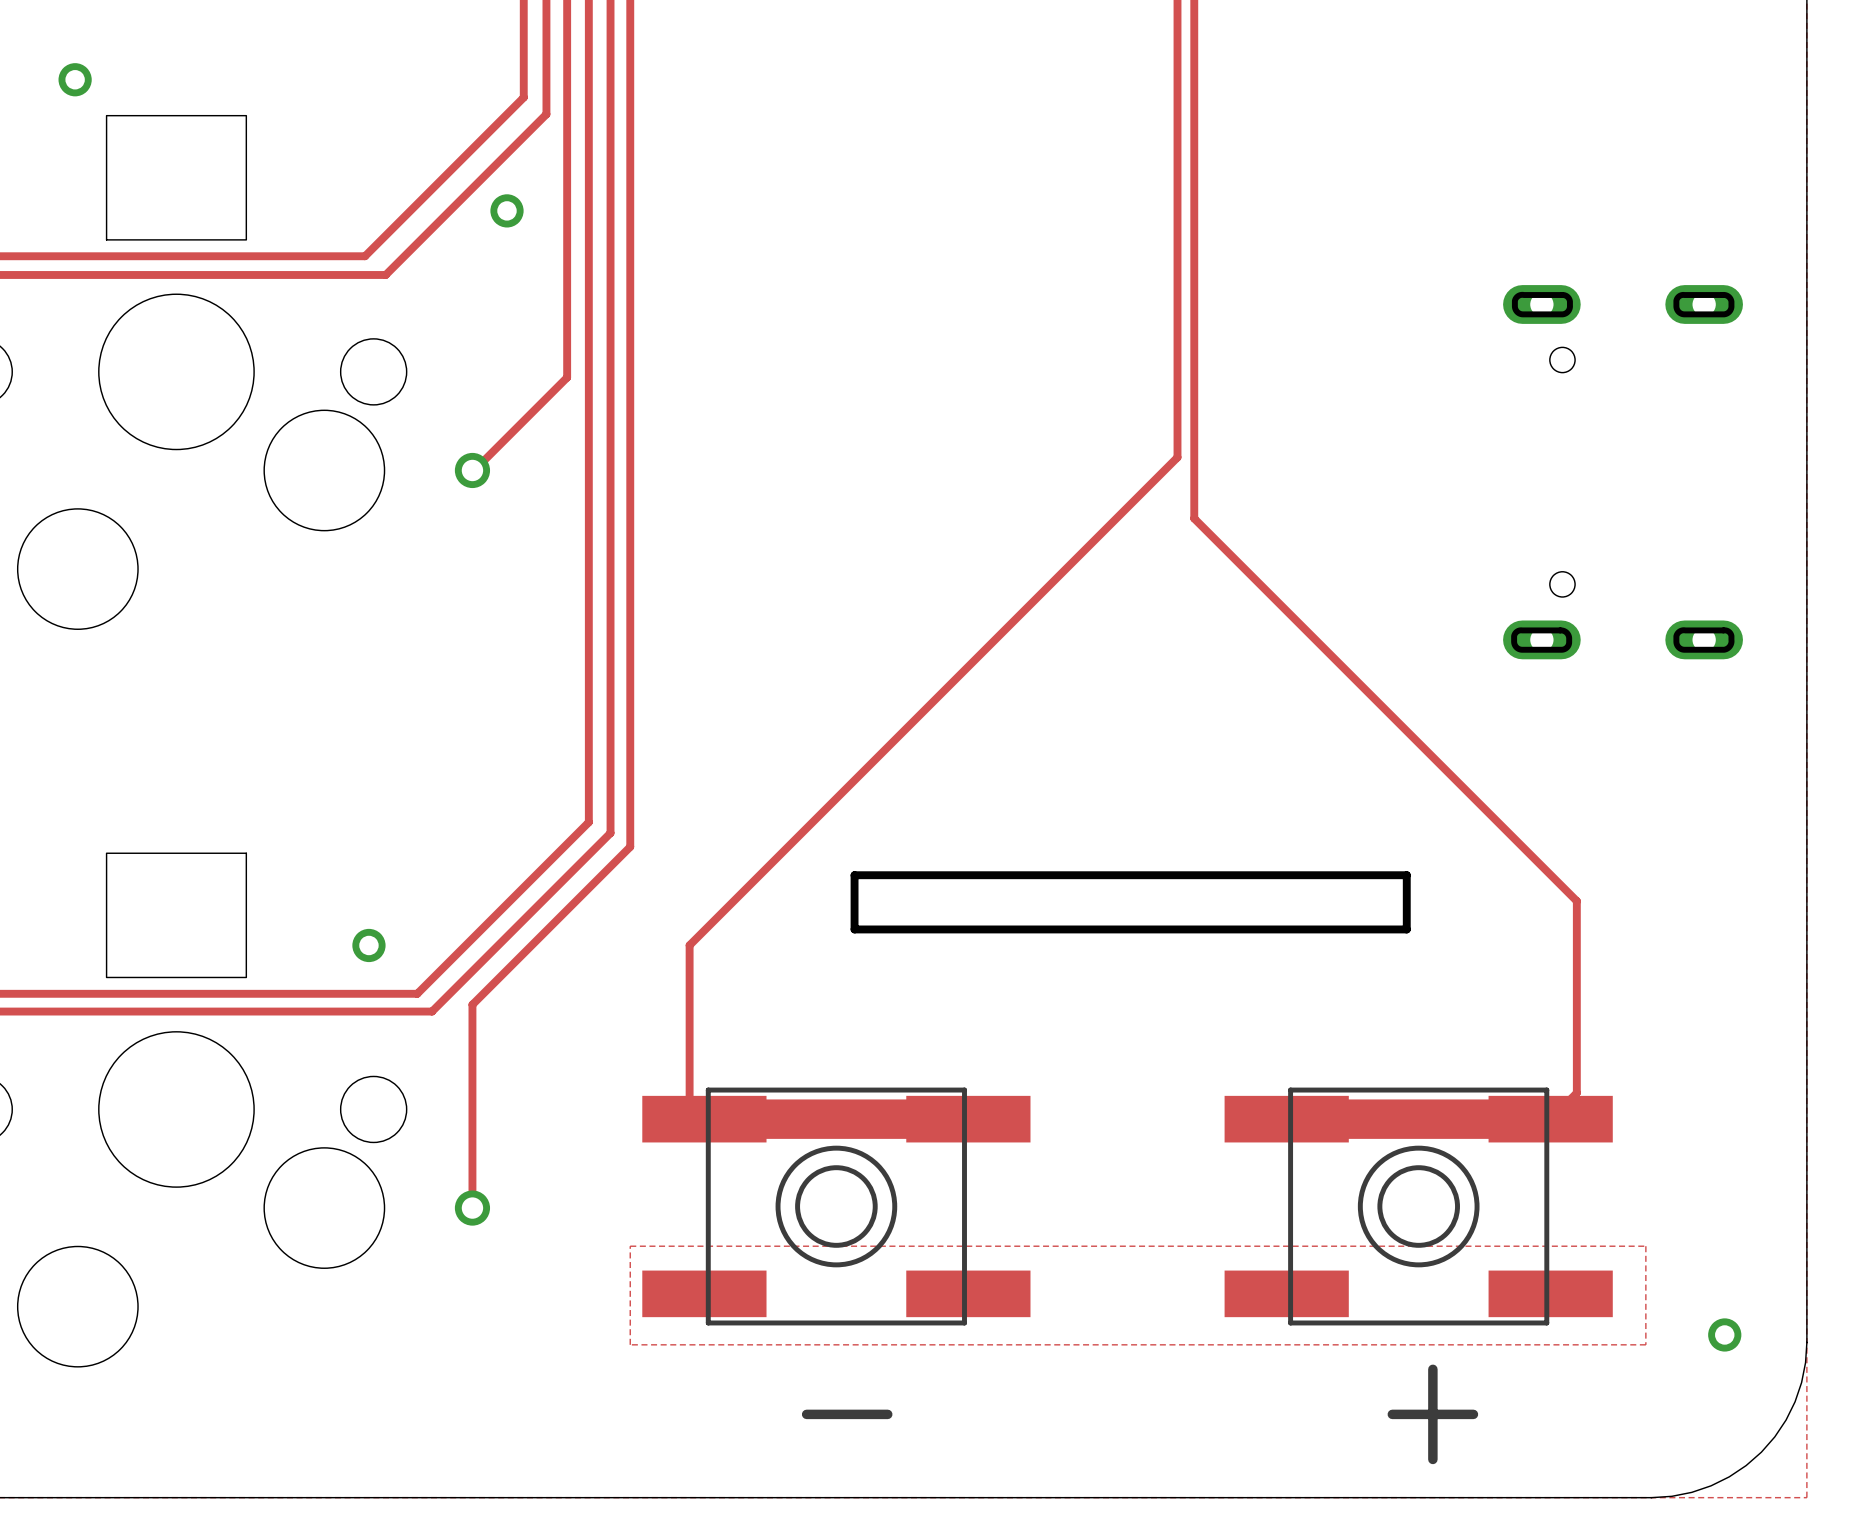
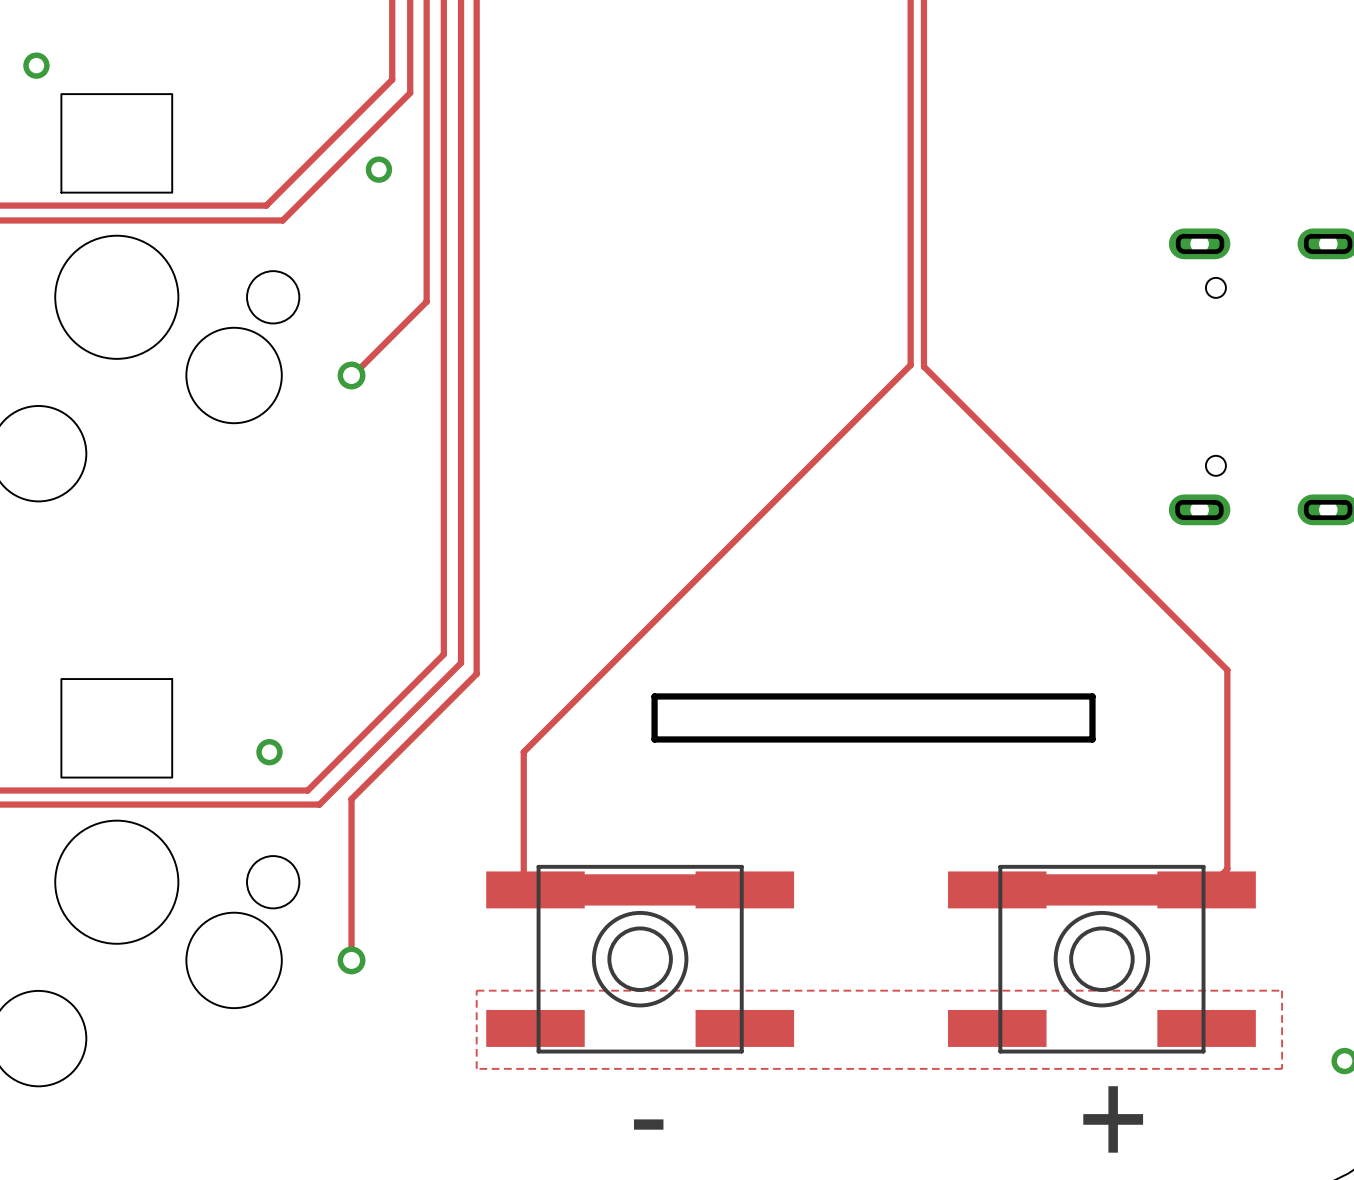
track: (1194, 459) (1194, 518) (1576, 901) -> (923, 366) (1227, 670) (1227, 717)

